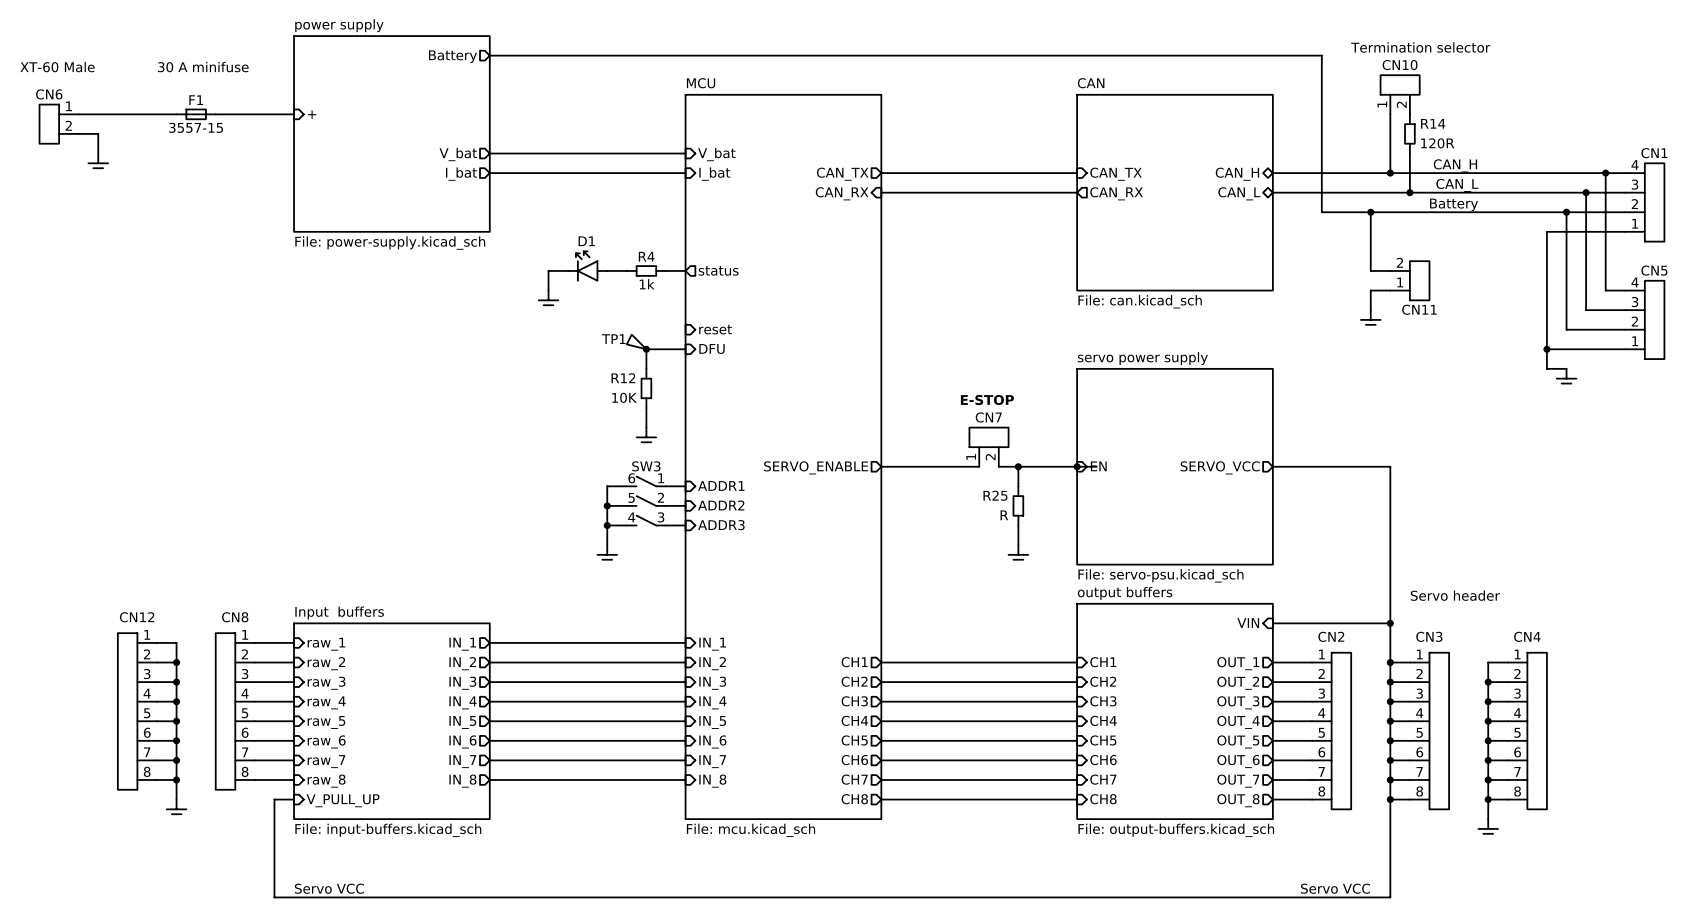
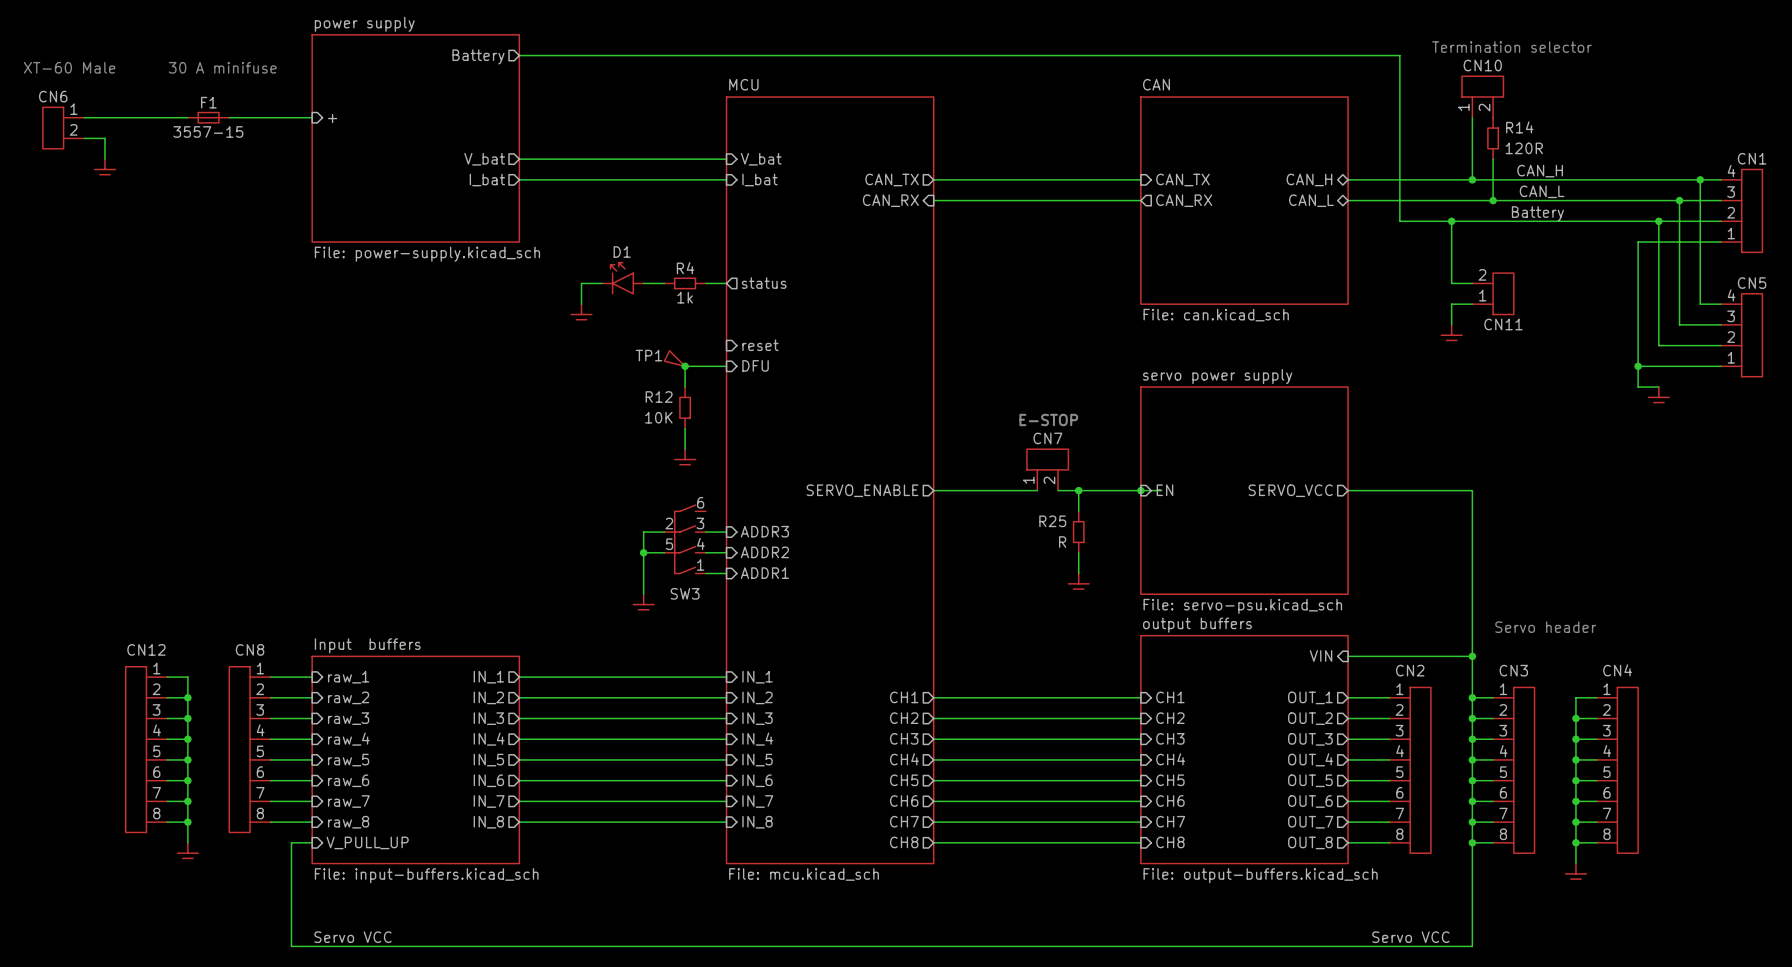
SW3 name position: SW3 (646, 466) -> SW3 (685, 593)
SW3 symbol: [626, 476, 666, 526] -> [664, 505, 706, 574]
sheet pin position: ADDR1 (721, 485) -> ADDR1 (764, 573)
wire: (626, 486) (607, 486) (607, 505) -> none
wire: (665, 486) (685, 486) -> (705, 573) (726, 573)
junction: (607, 505) -> none
sheet pin: ADDR2 (721, 505) -> ADDR3 (764, 531)
sheet pin: ADDR3 (721, 525) -> ADDR2 (764, 552)
power symbol position: (607, 554) -> (643, 604)

